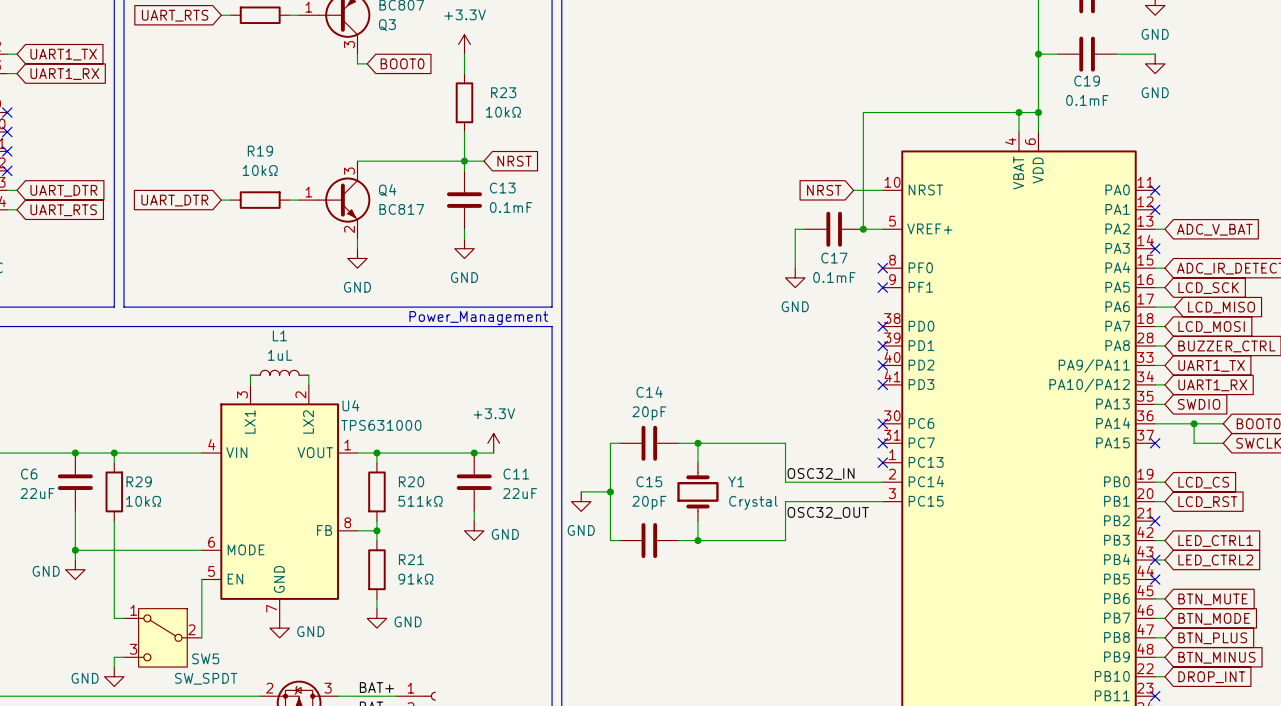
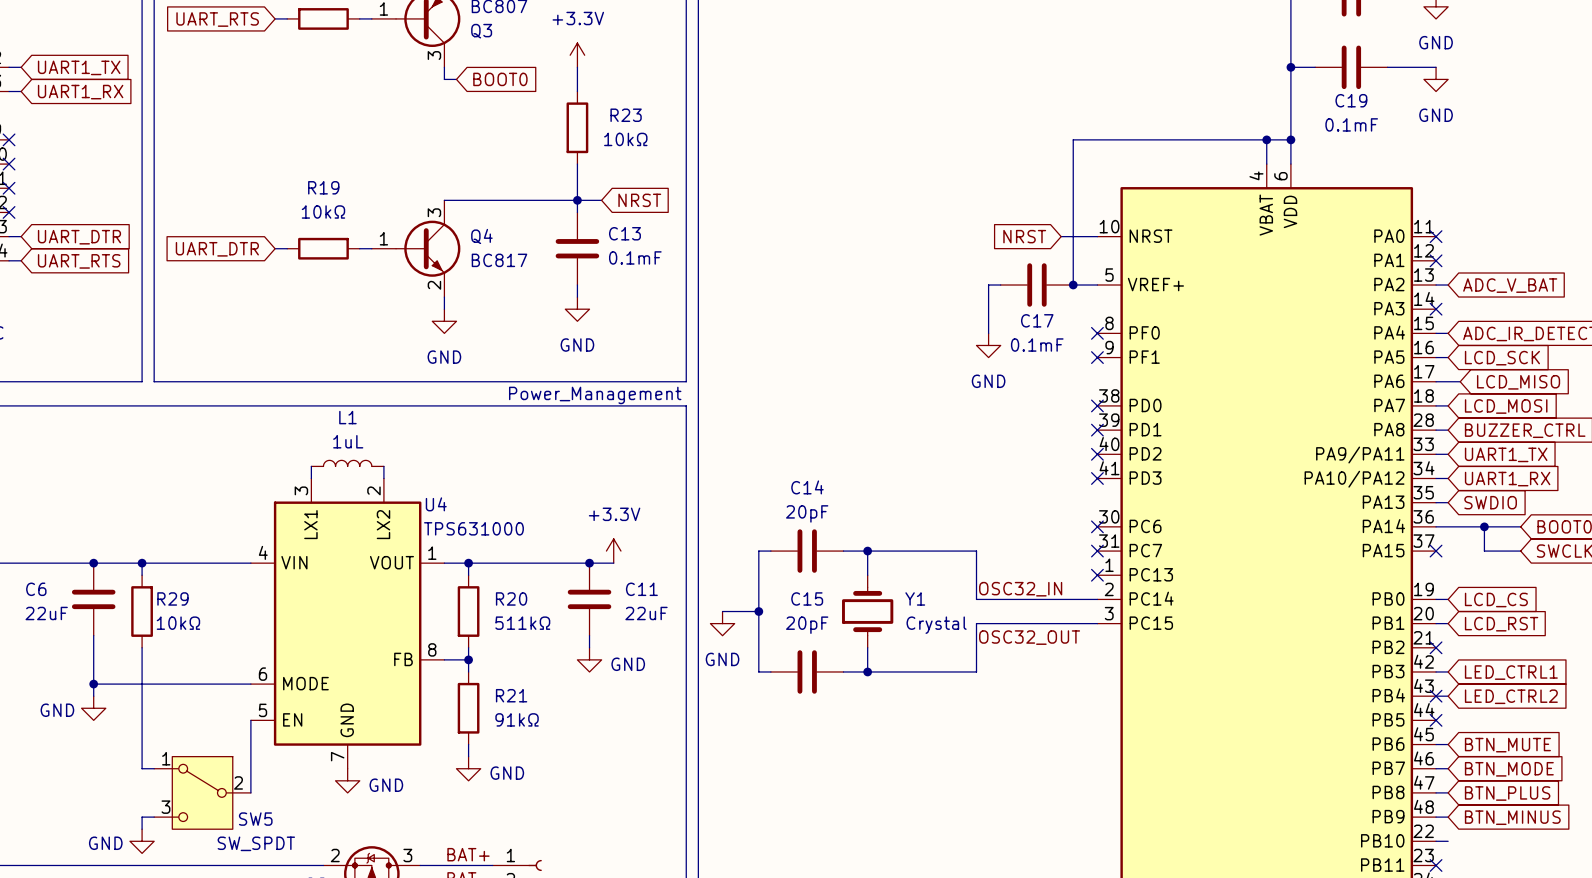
global label: DROP_INT (1211, 677) -> none

